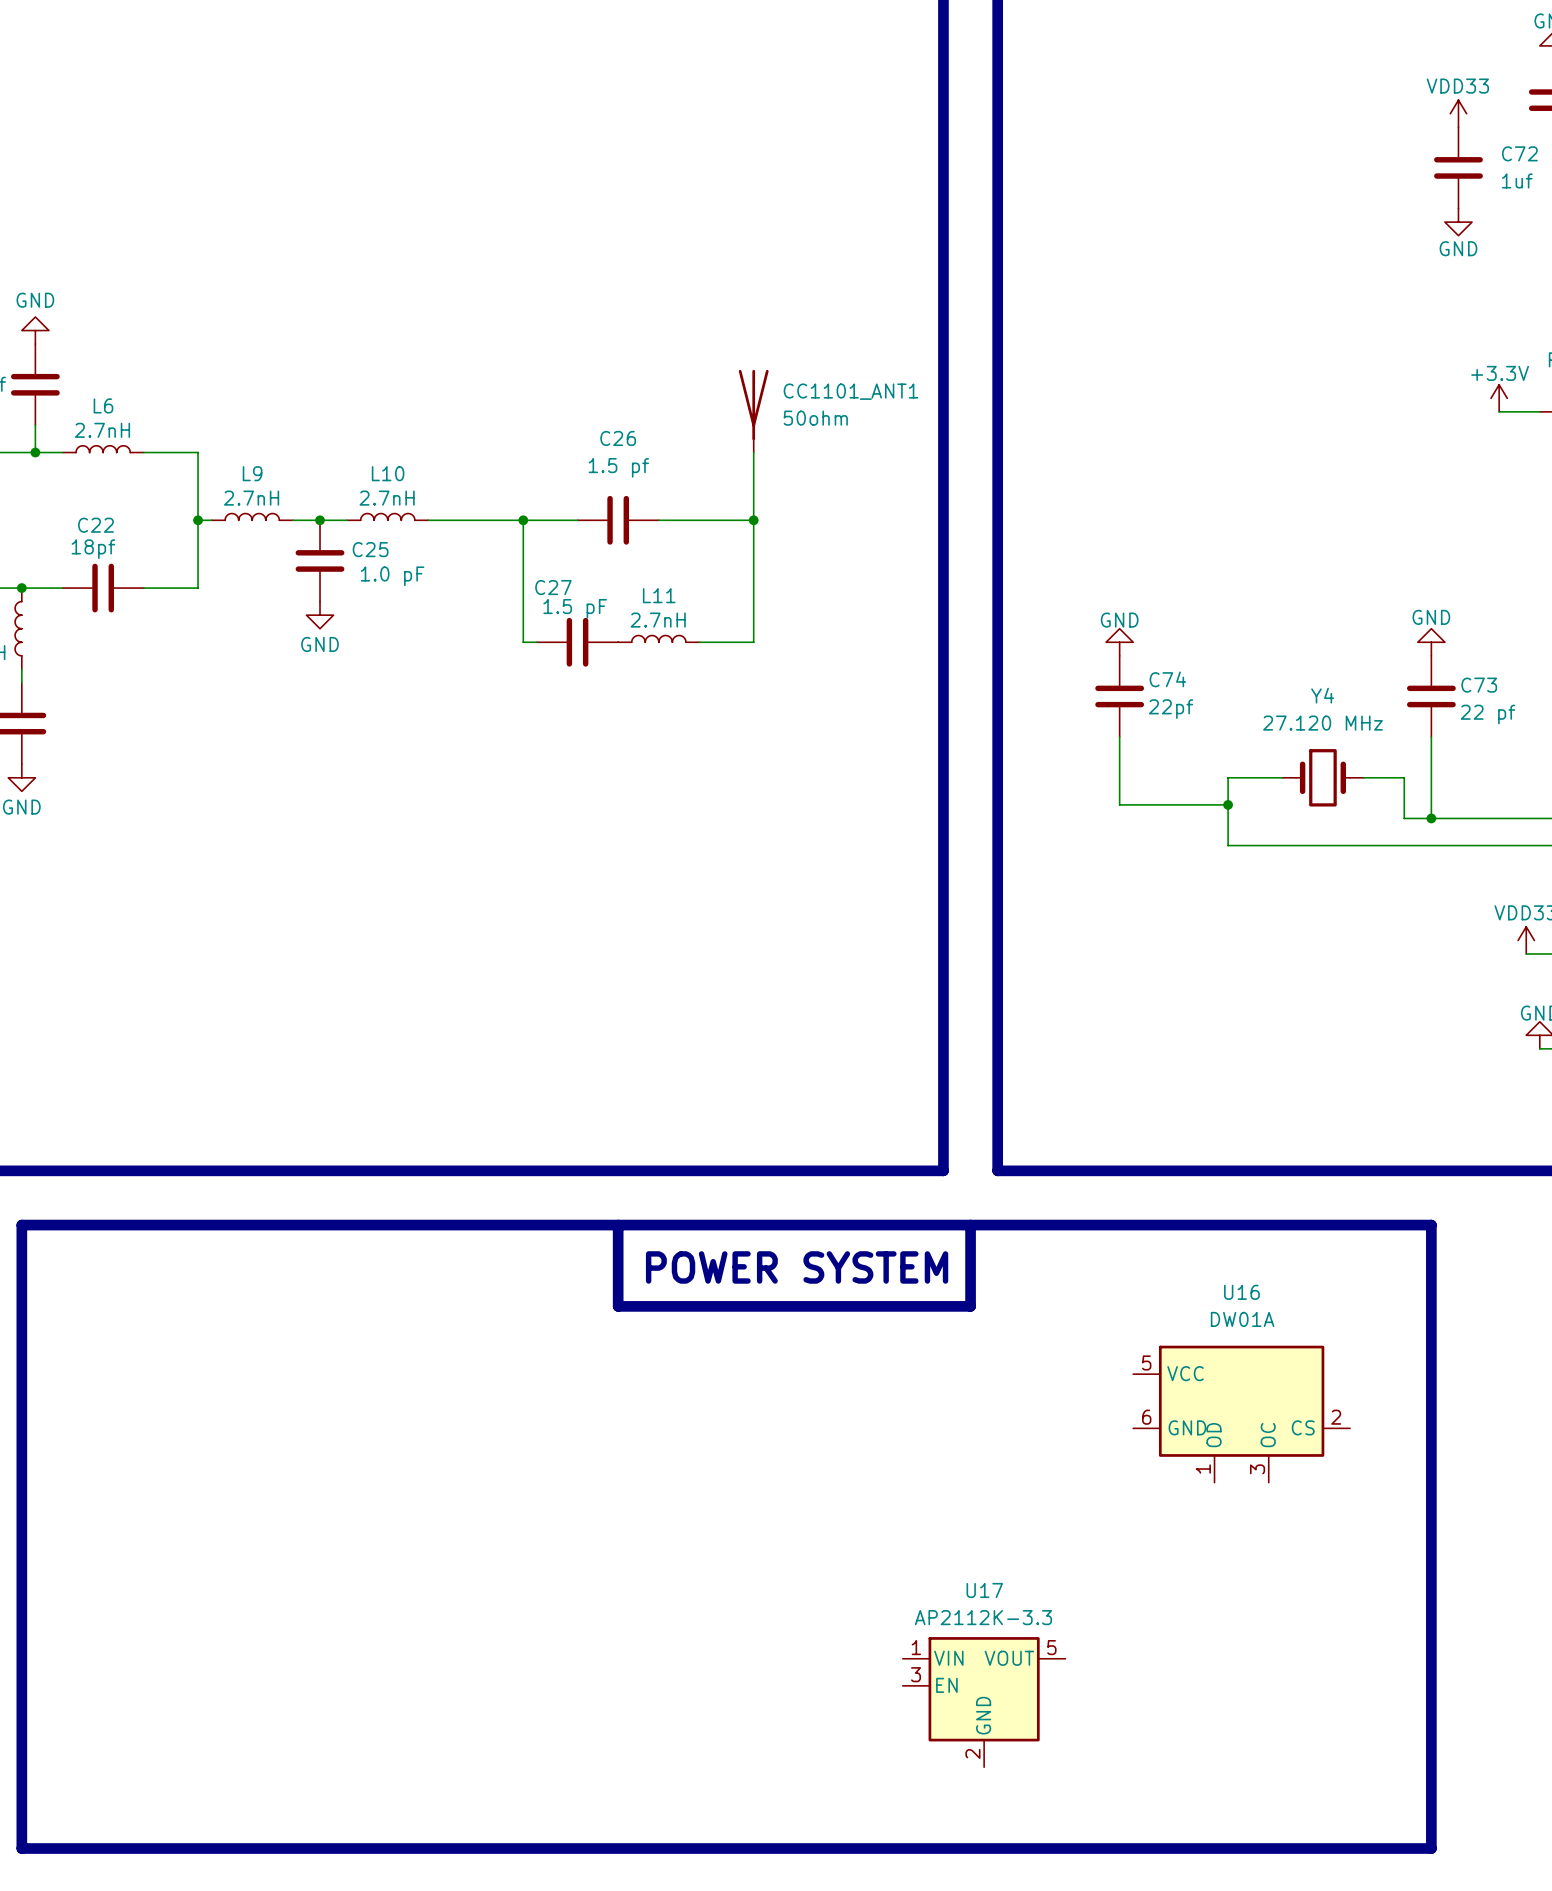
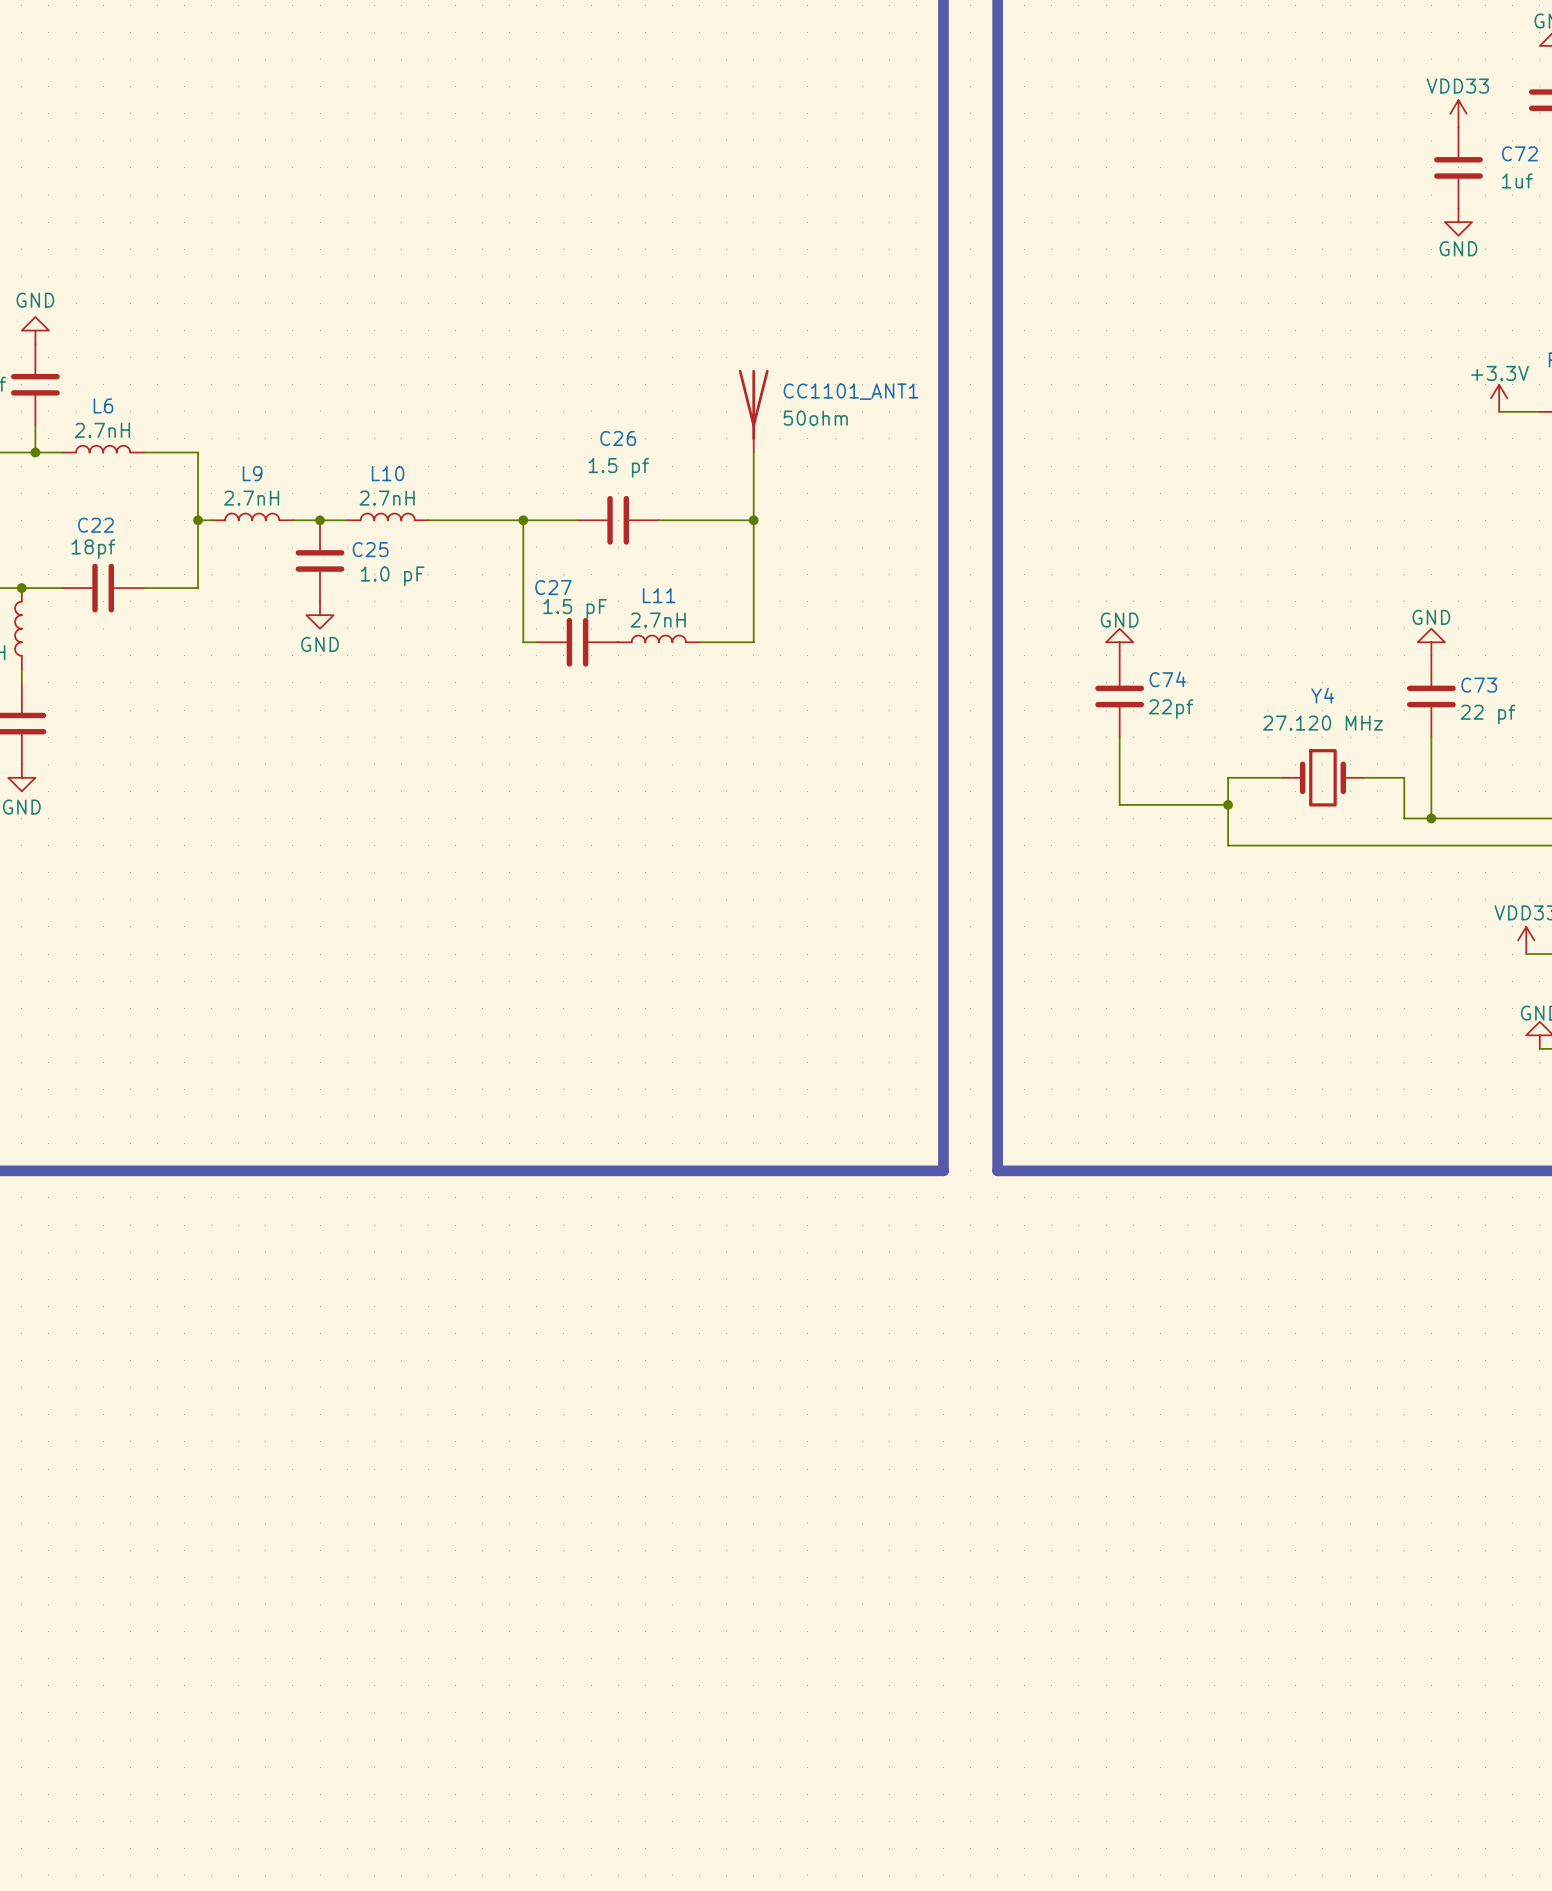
line: (21, 1225) (21, 1848) (1431, 1848) (1431, 1225) (21, 1225) -> none
line: (618, 1225) (618, 1306) (970, 1306) (970, 1225) -> none
text: POWER SYSTEM (797, 1267) -> none
U16: DW01A (1241, 1414) -> none
U17: AP2112K-3.3 (984, 1702) -> none

